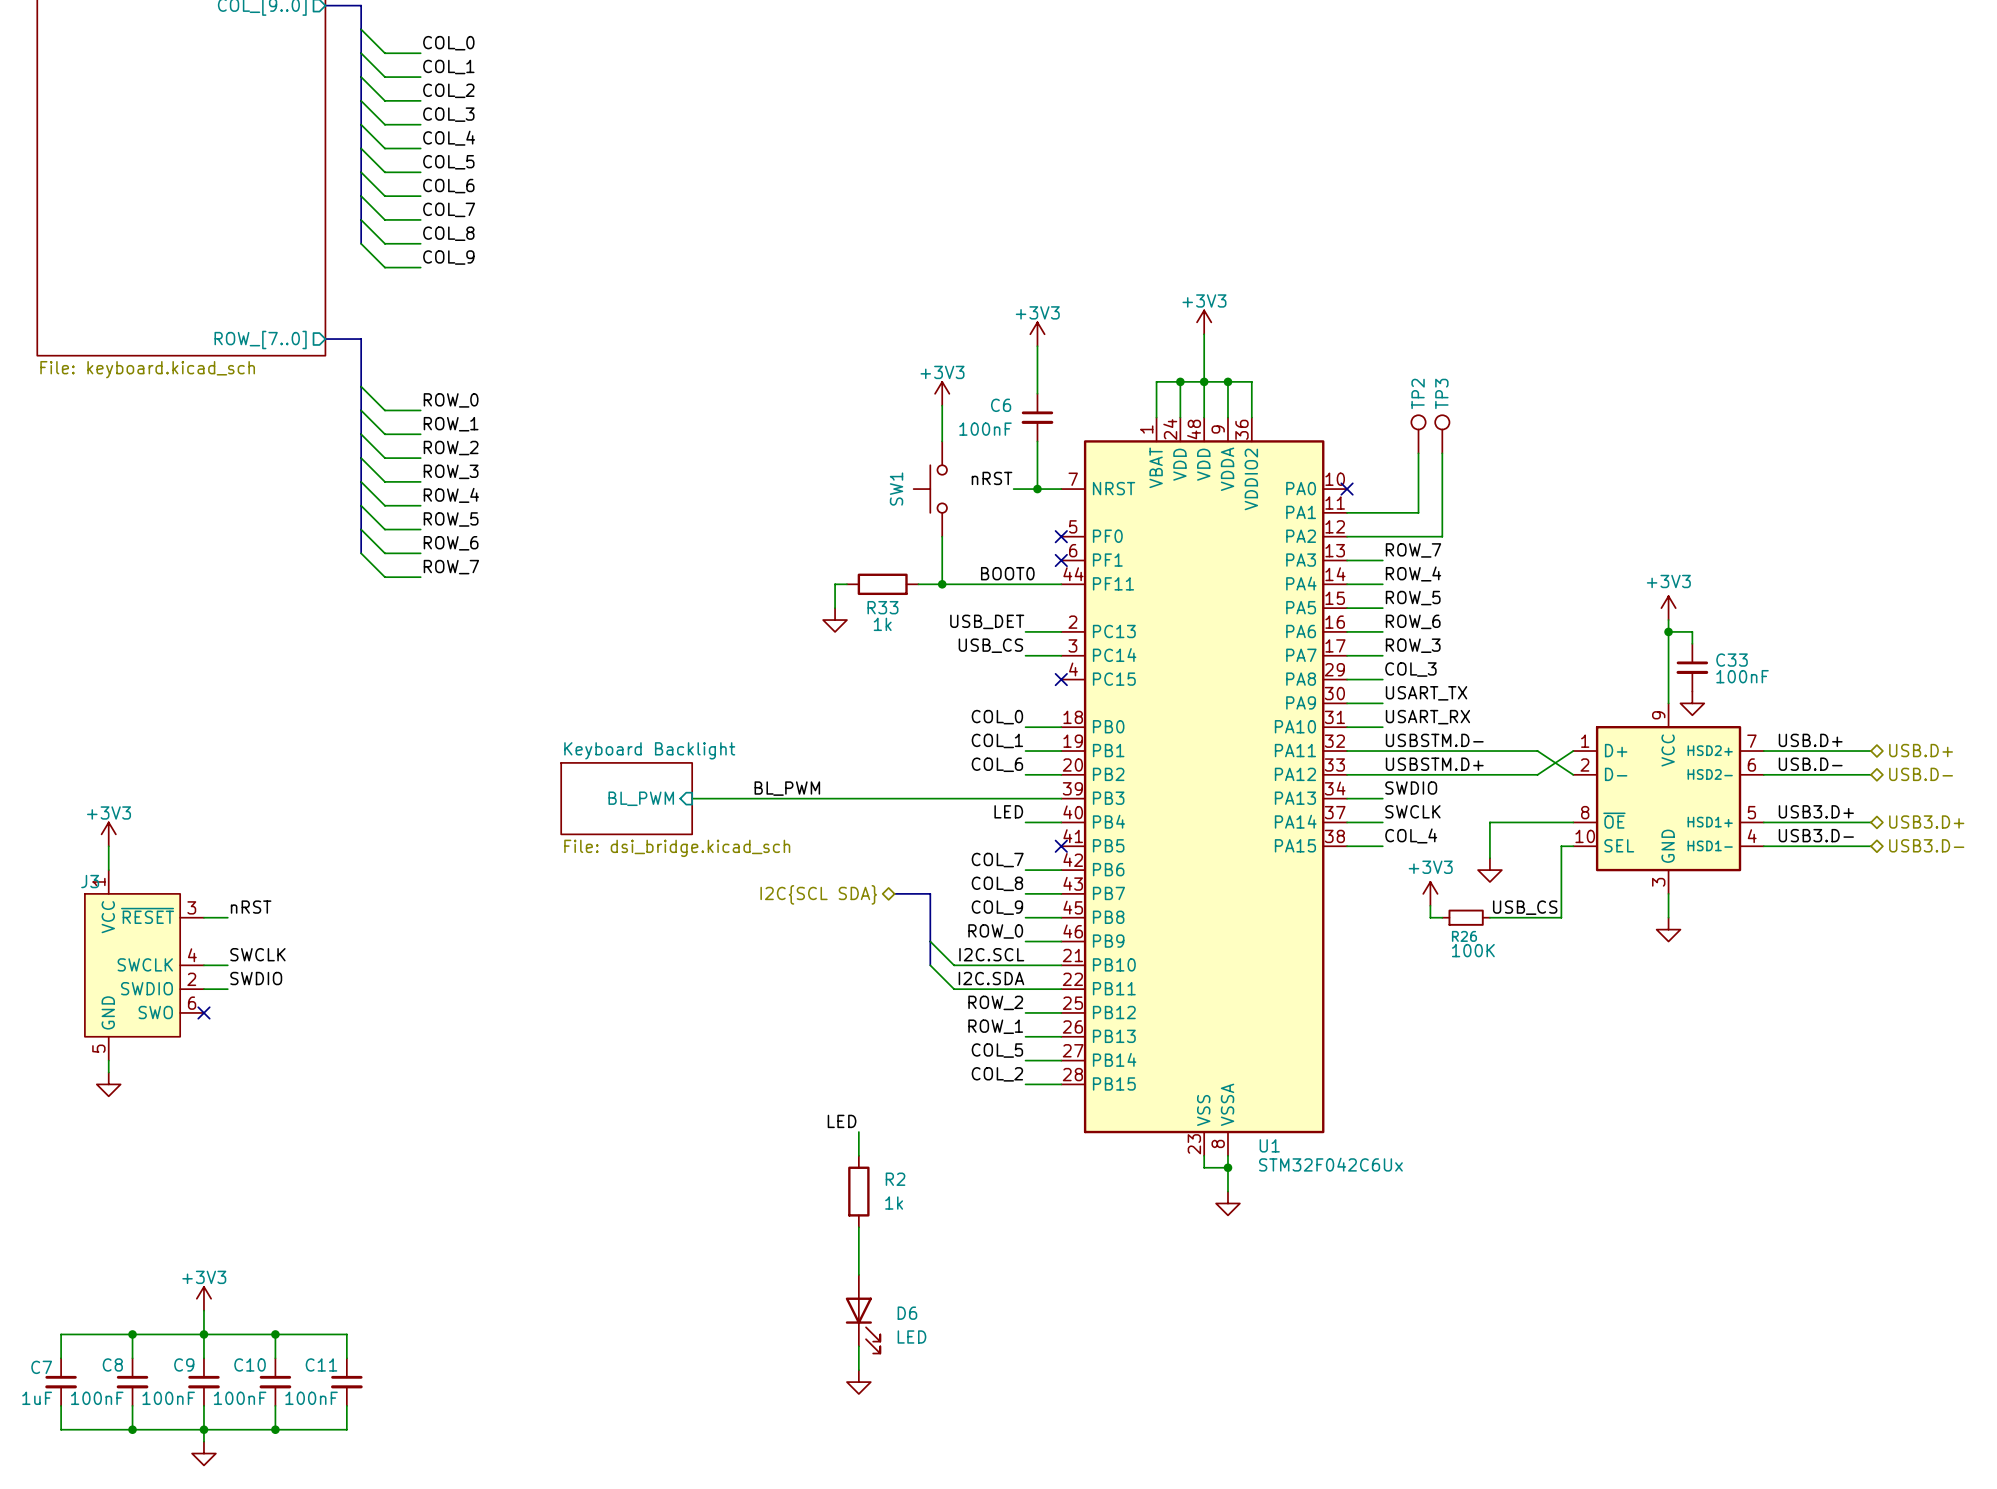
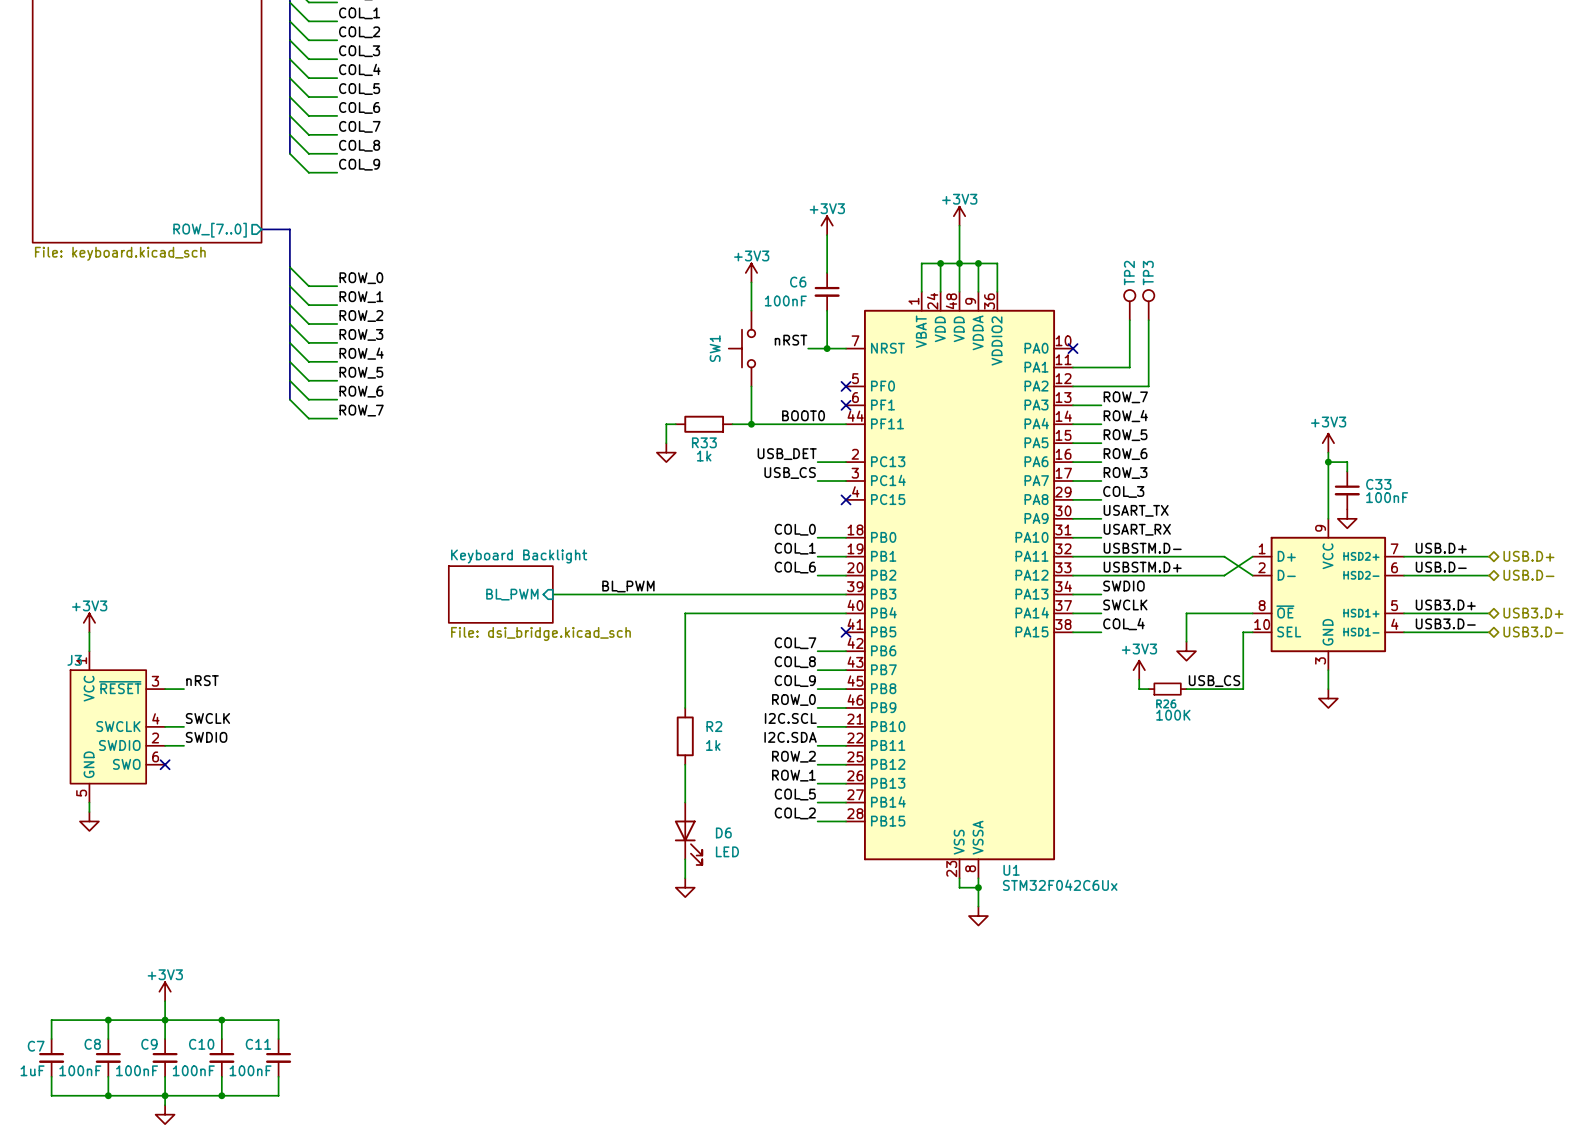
label: LED (1008, 811) -> none
wire: none -> (817, 613) (685, 613) (685, 707)
bus: (894, 893) (930, 893) (930, 965) -> none
hierarchical label: I2C{SCL SDA} (818, 894) -> none
wire: (930, 941) (954, 965) (1025, 965) -> none
wire: (930, 965) (954, 989) (1025, 989) -> none
label: LED (842, 1121) -> none
R2 position: (858, 1191) -> (685, 736)
wire: (858, 1227) (858, 1274) -> (685, 764) (685, 802)
D6 position: (863, 1314) -> (688, 833)
wire: (858, 1346) (858, 1370) -> none
power symbol position: (858, 1382) -> (685, 887)

